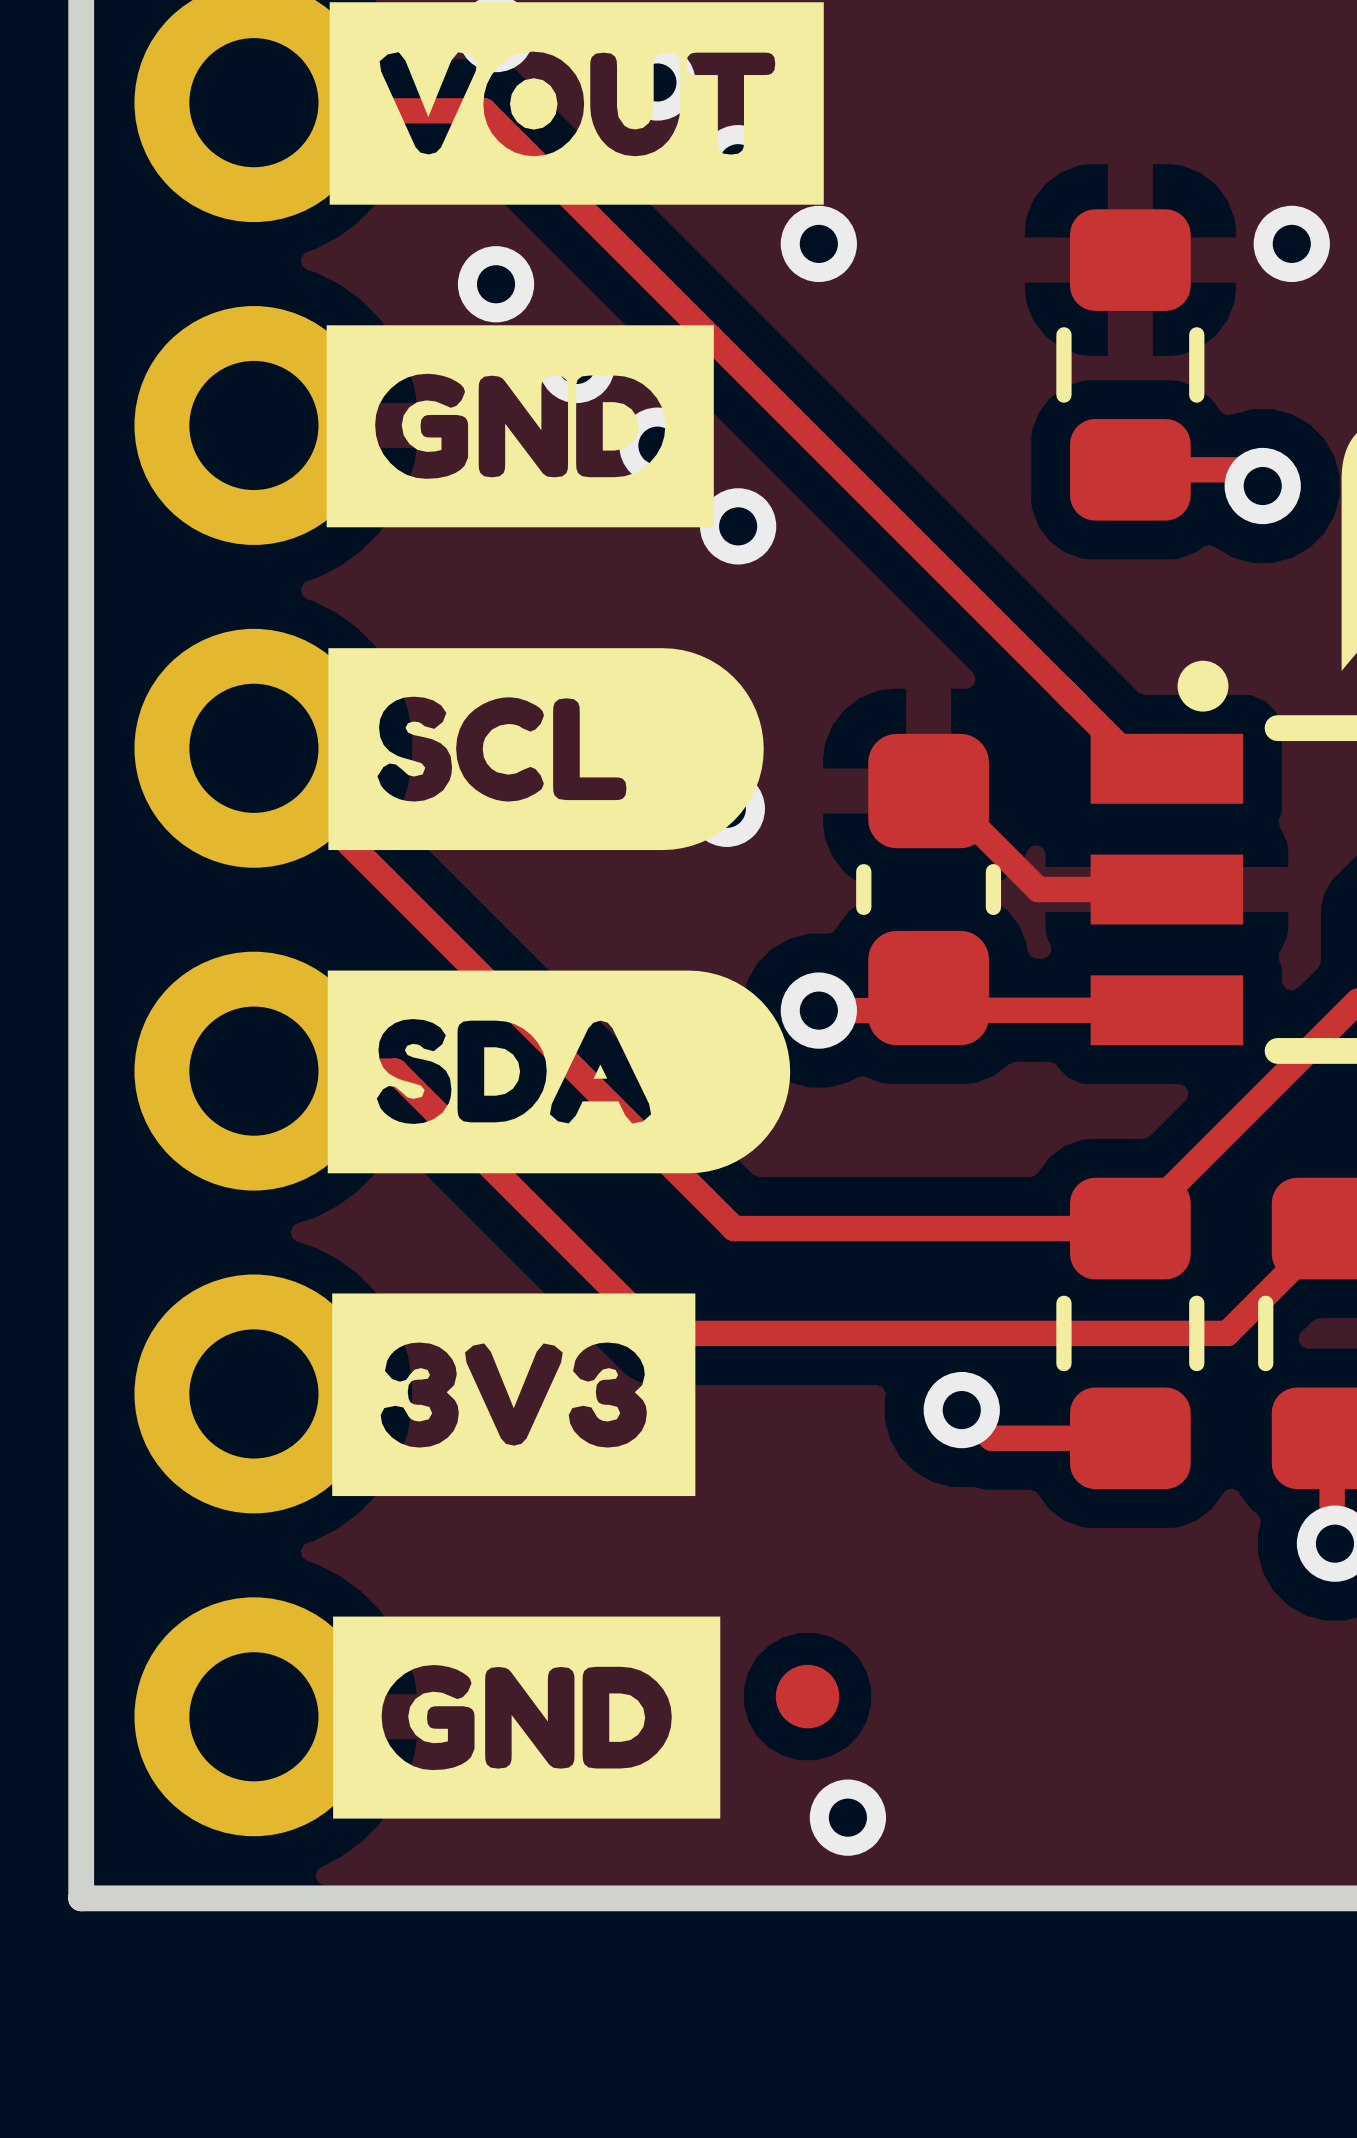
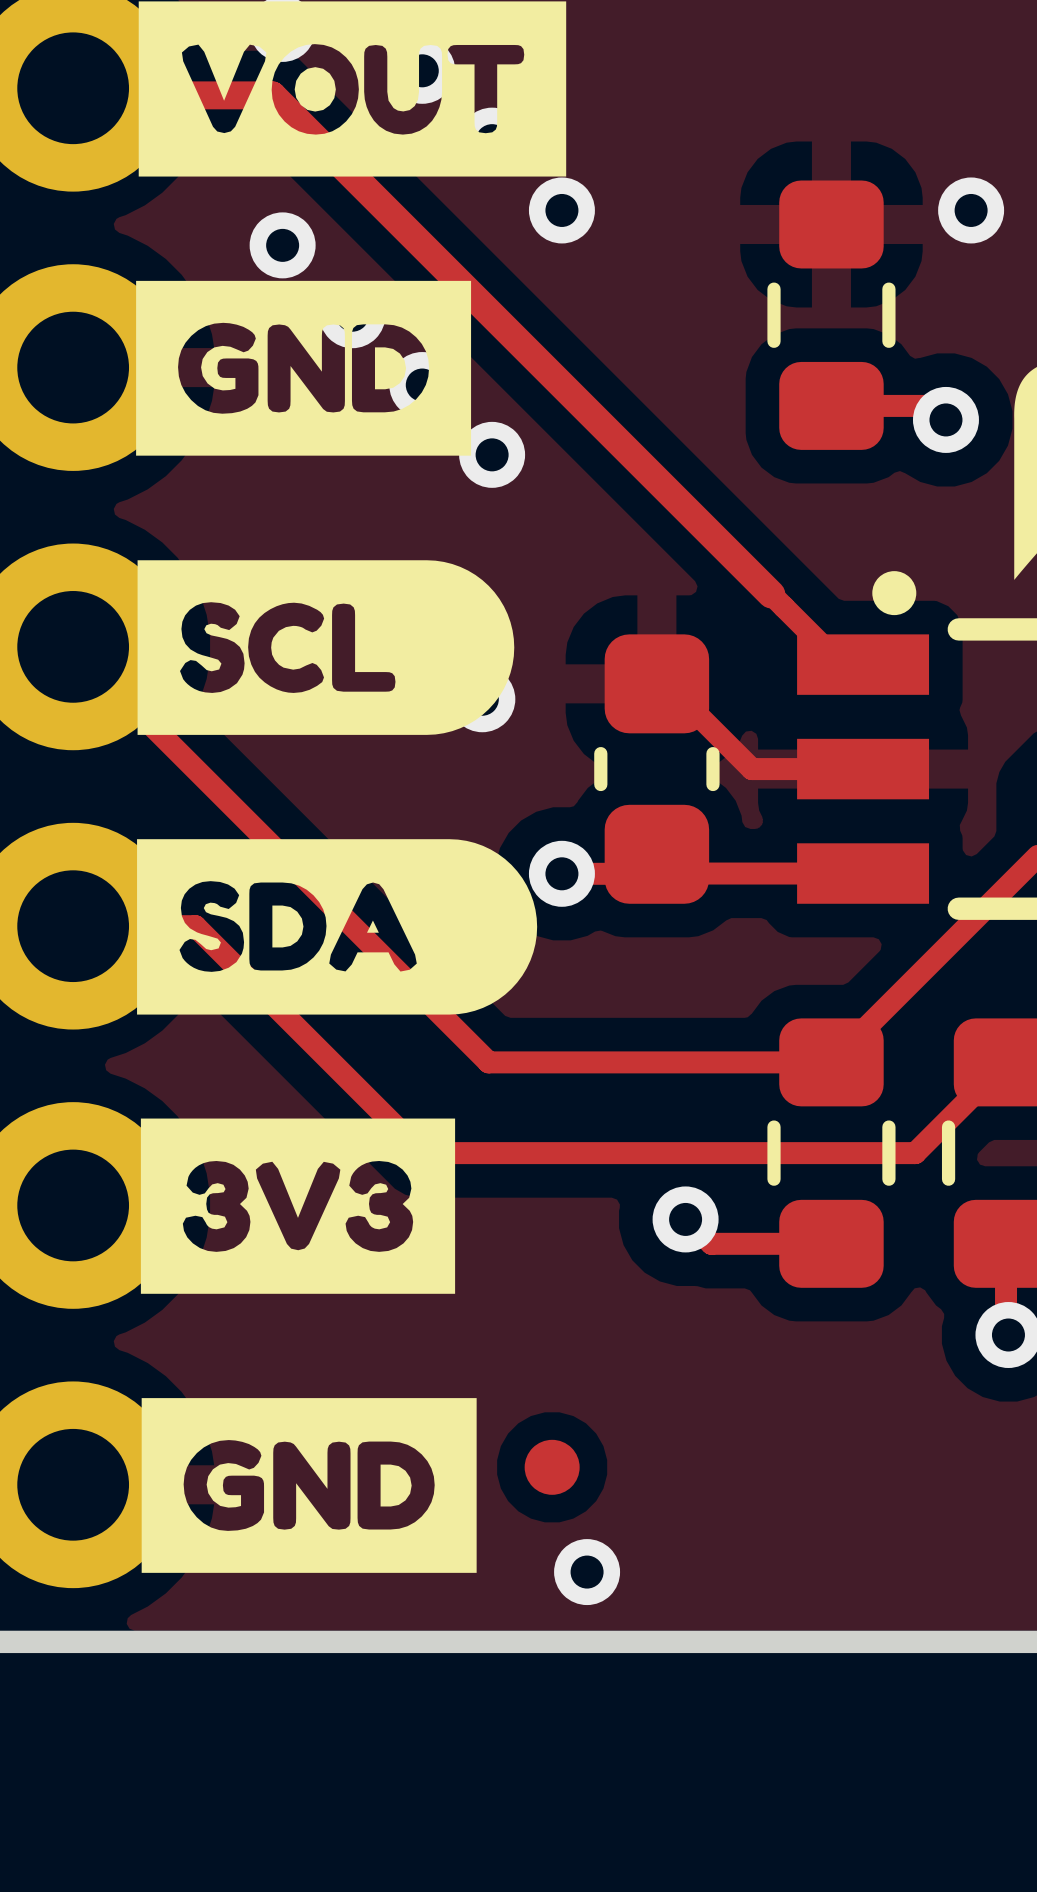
track width: thin (262, 110) (484, 110) (1060, 687) -> thick (80, 95) (272, 95) (771, 594)

